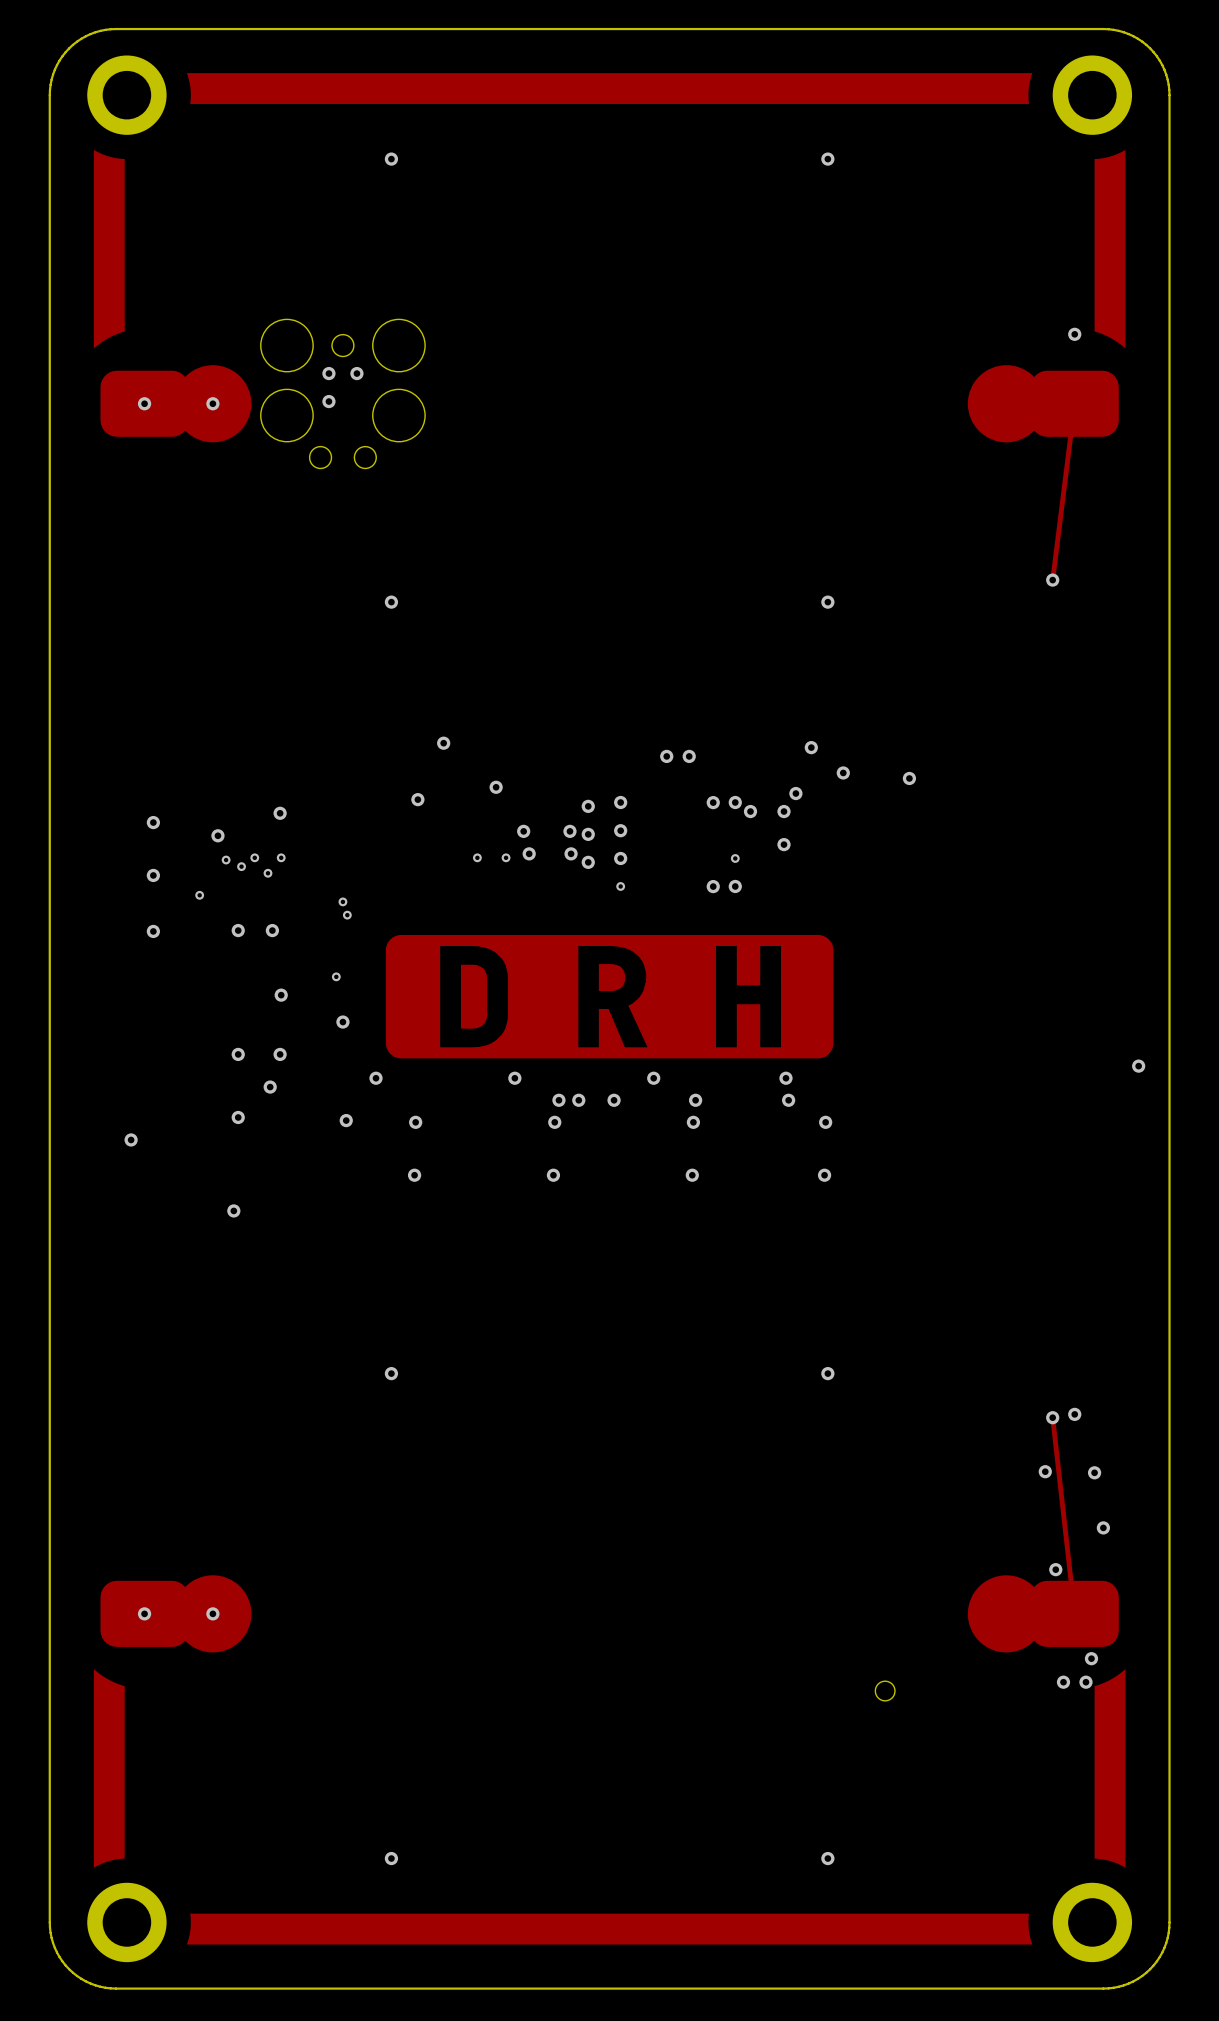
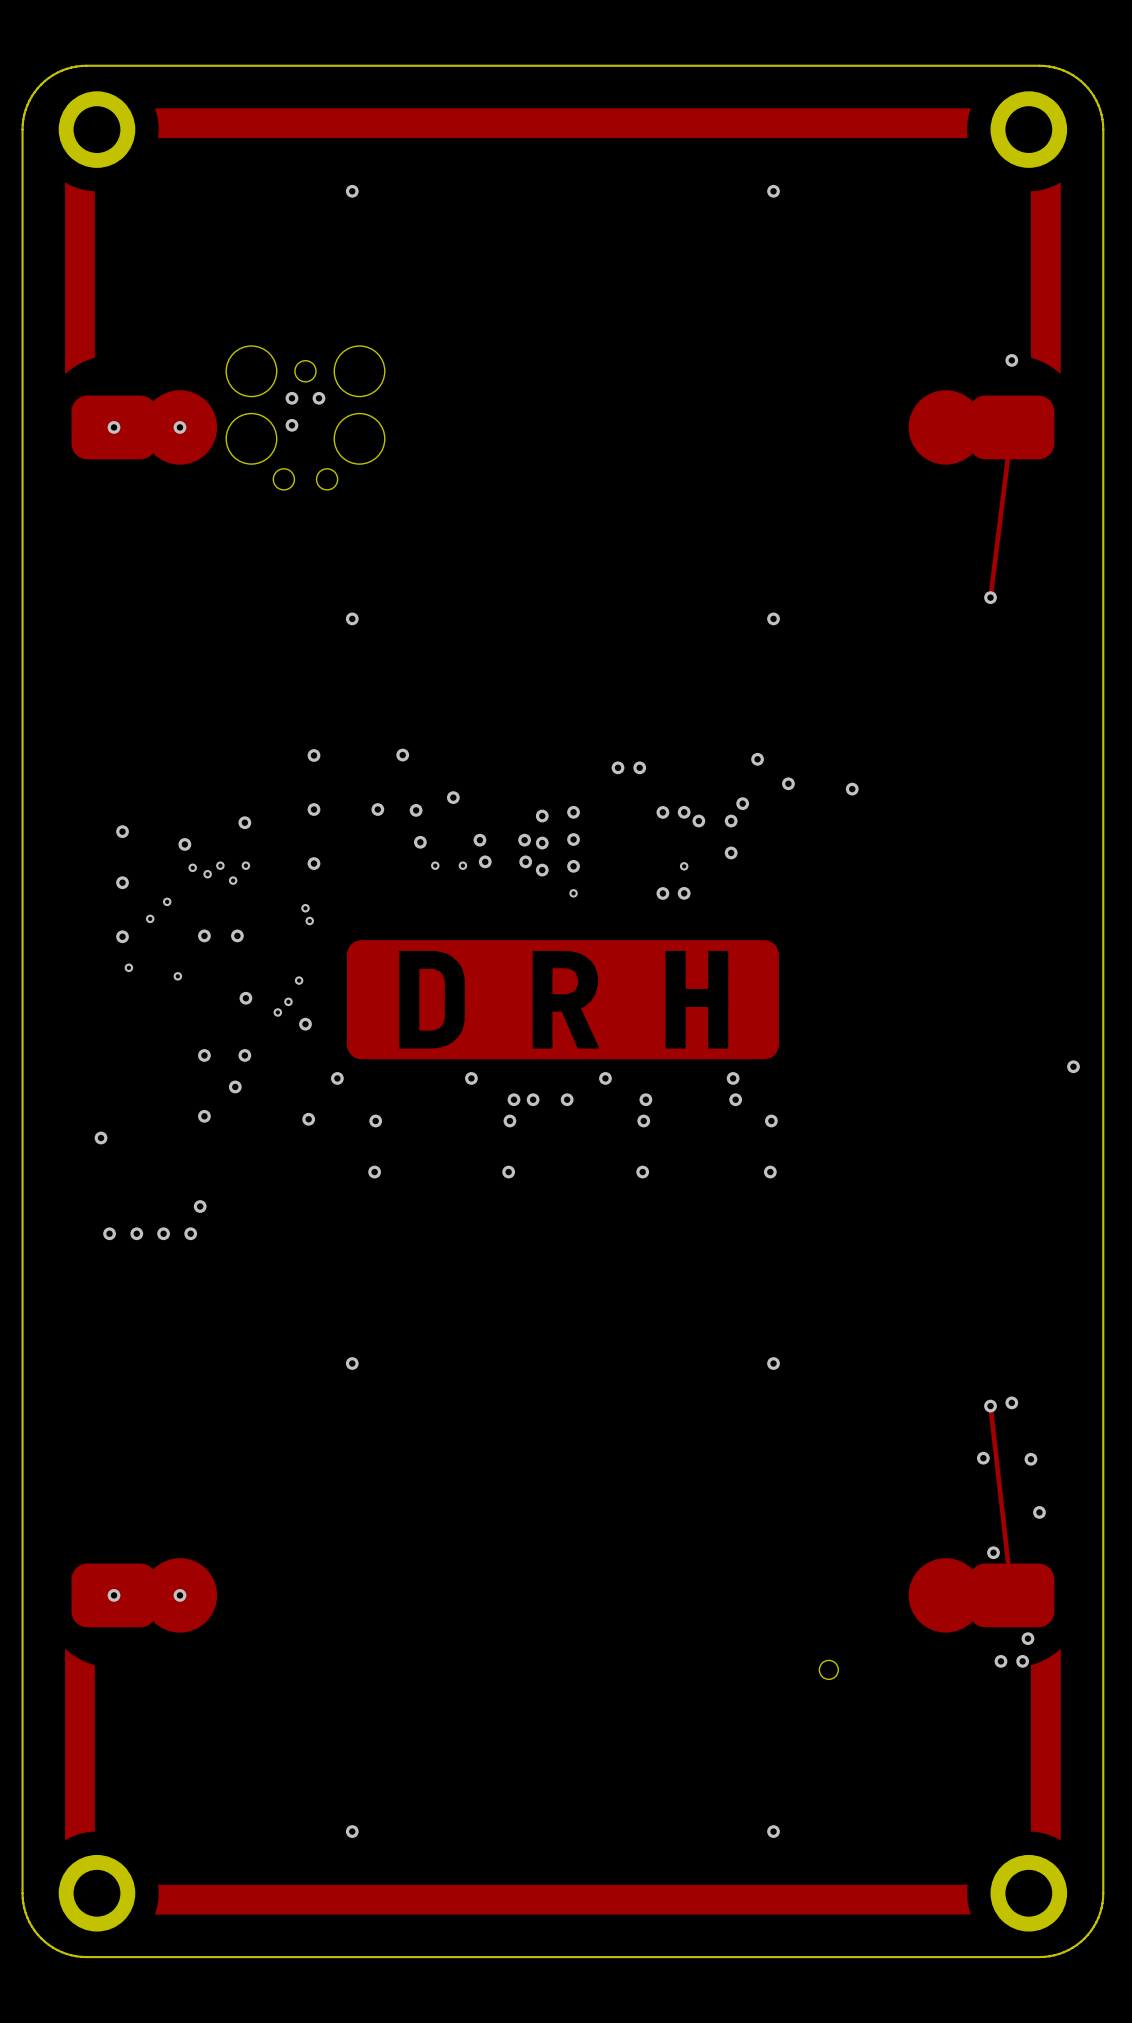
via: none -> (313, 755)
via: none -> (313, 809)
via: none -> (416, 810)
via: none -> (420, 842)
via: none -> (313, 863)
via: none -> (150, 918)
via: none -> (128, 967)
via: none -> (177, 976)
via: none -> (288, 1001)
via: none -> (277, 1012)
via: none -> (109, 1233)
via: none -> (136, 1233)
via: none -> (163, 1233)
via: none -> (190, 1233)

